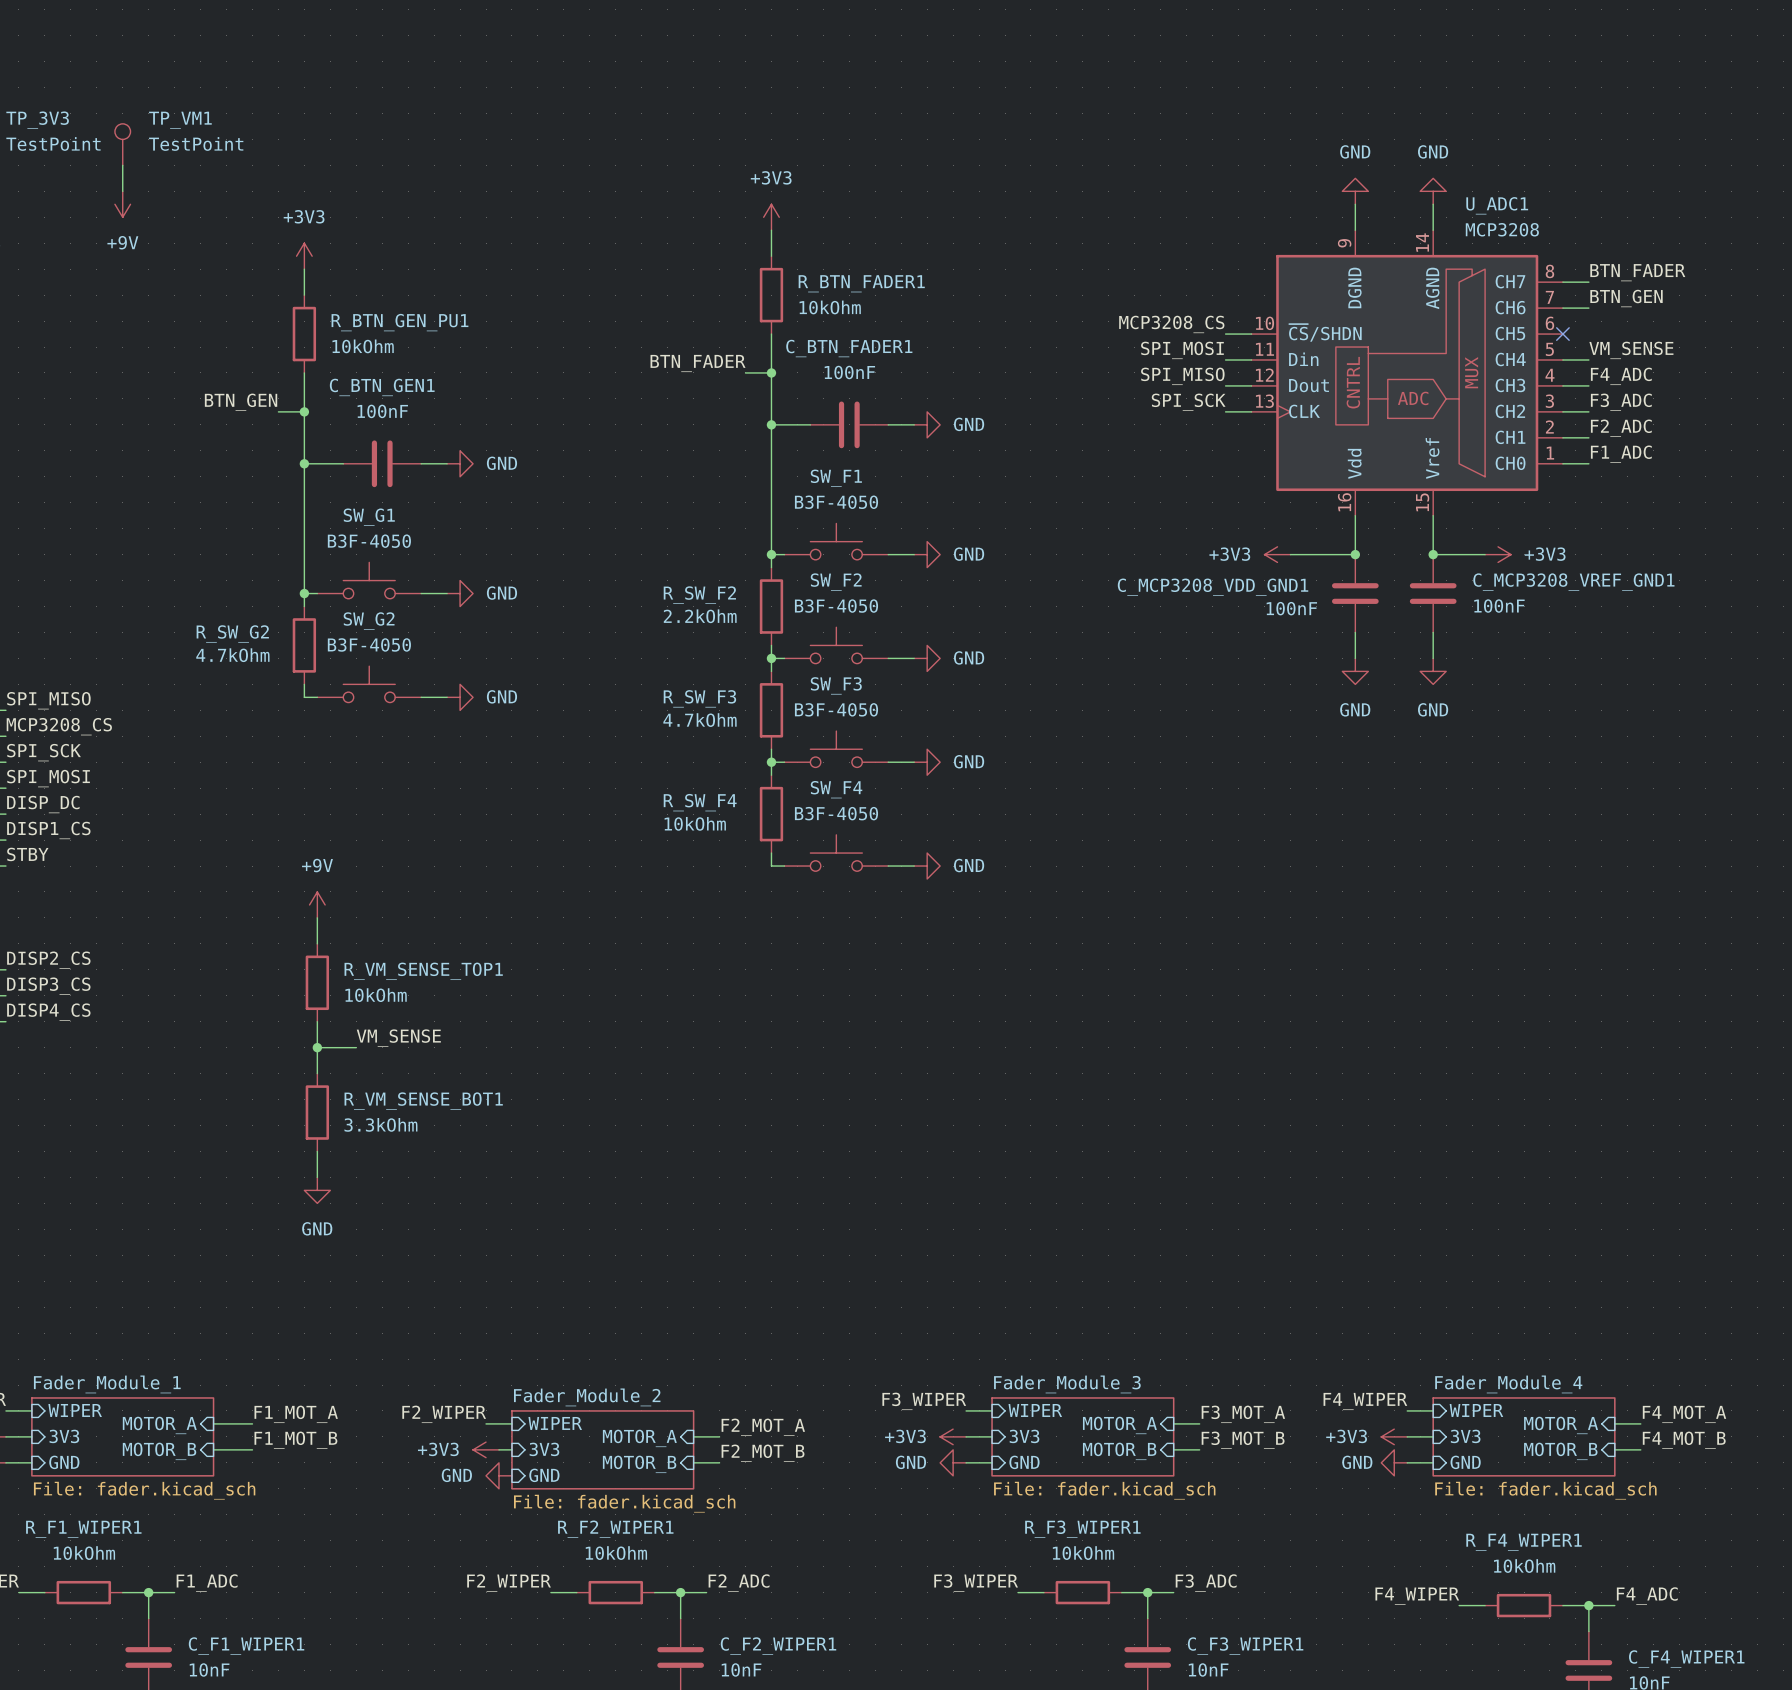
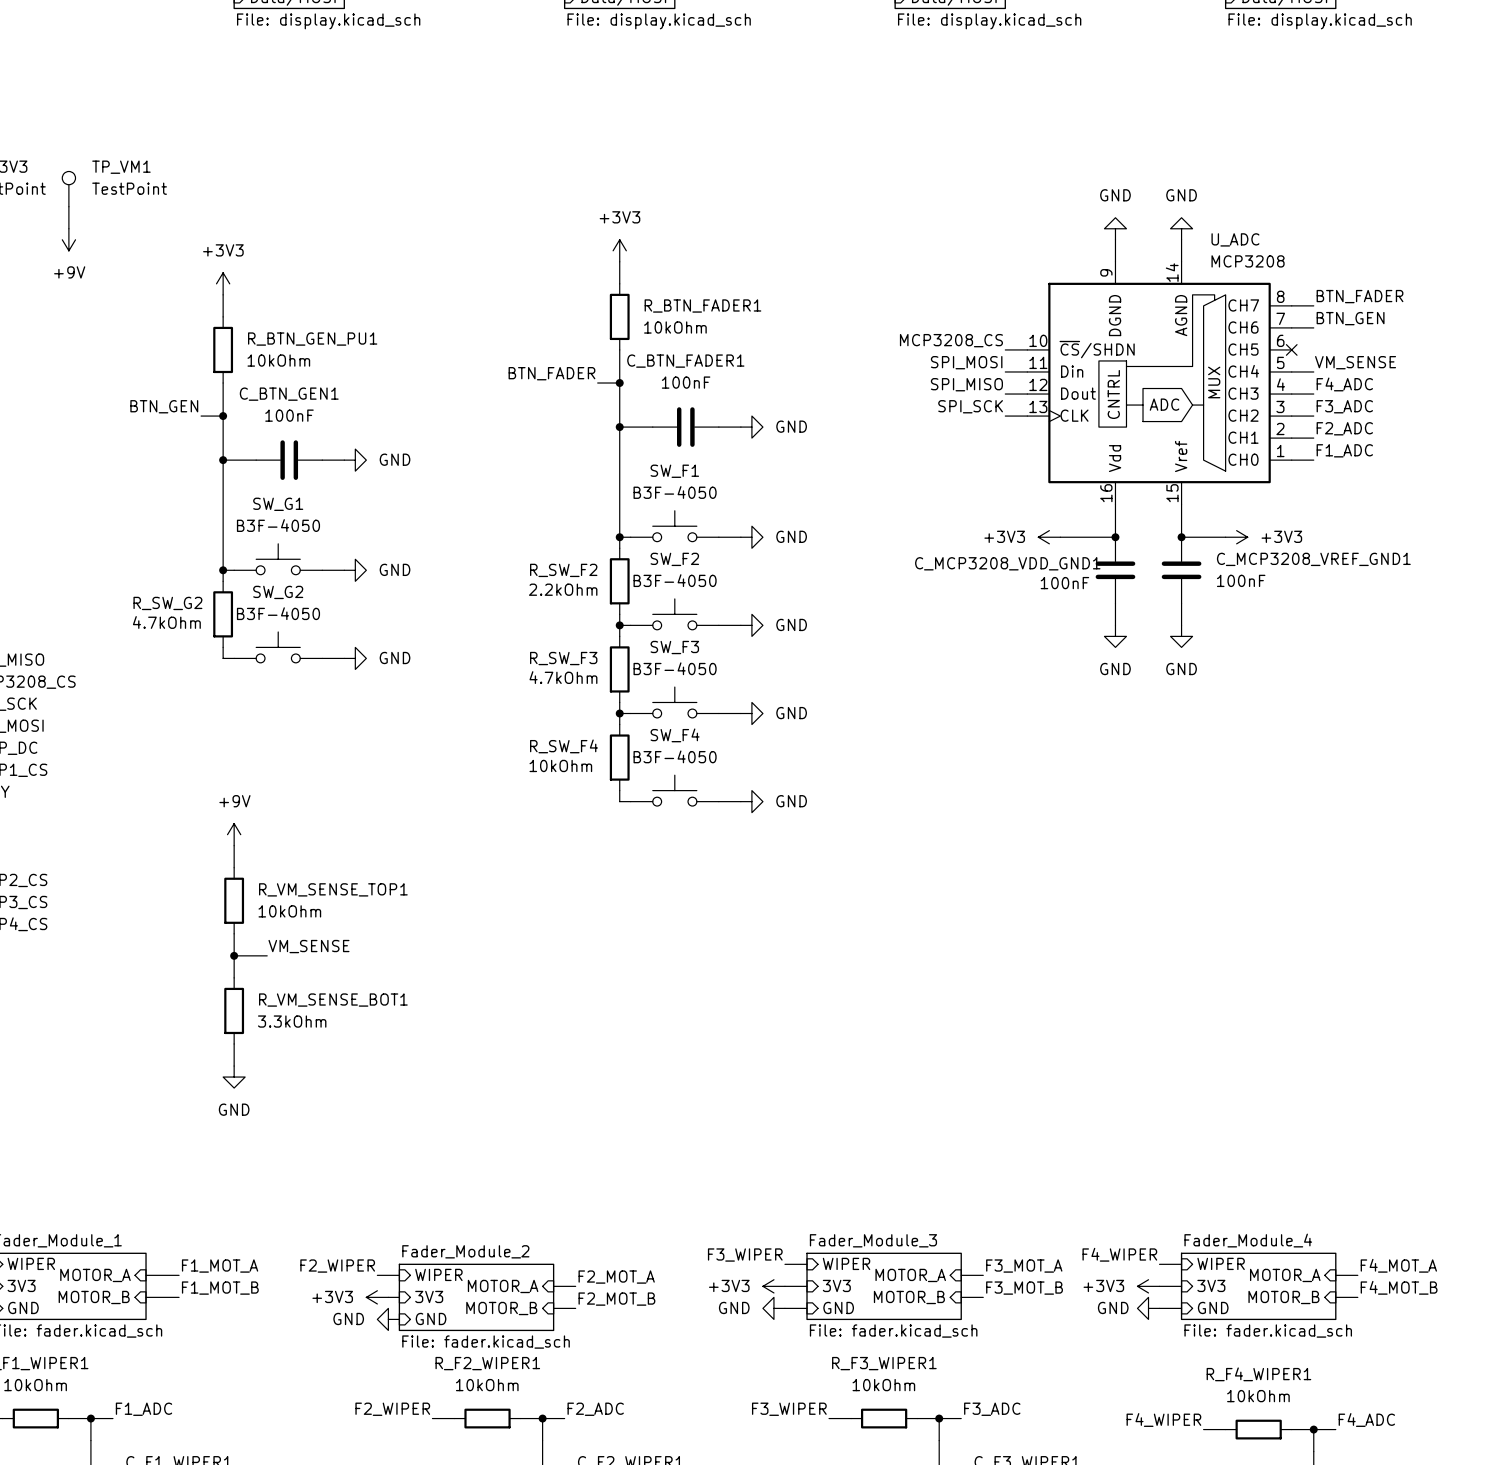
U_ADC1 name: U_ADC1 (1497, 205) -> U_ADC (1235, 239)

